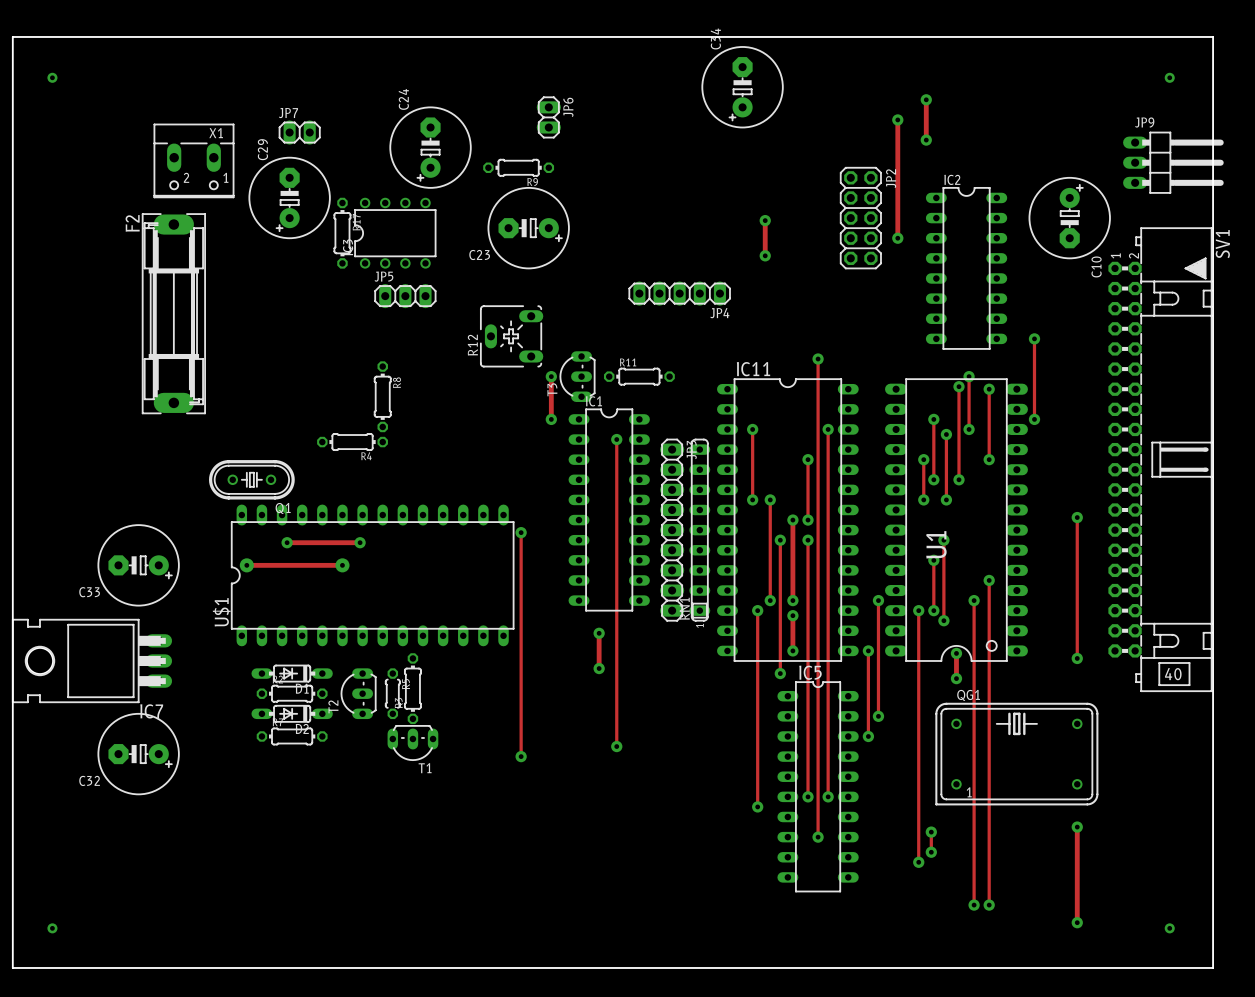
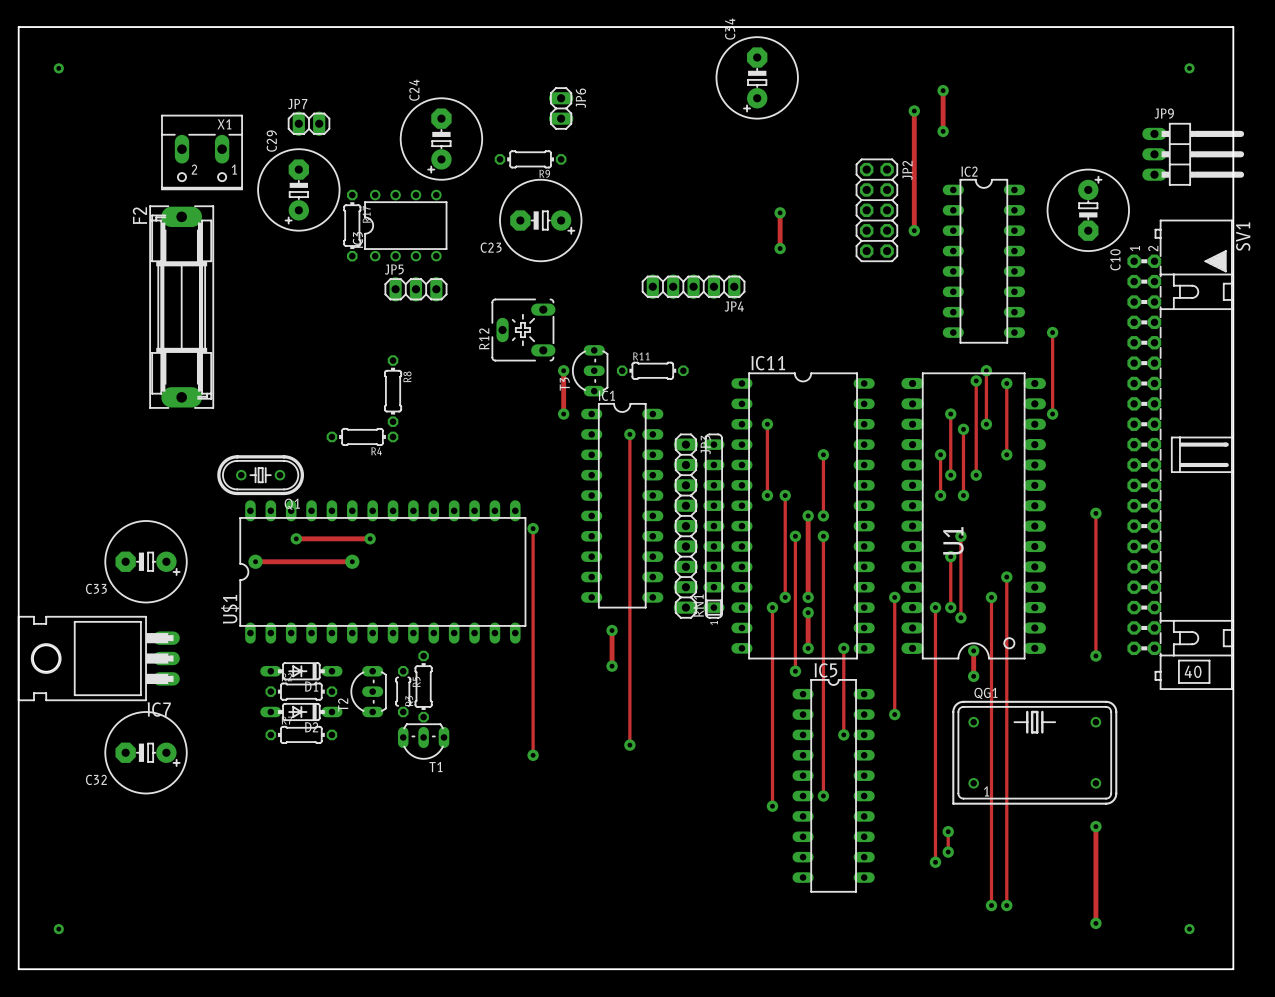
track: (818, 359) (818, 837) -> none
via: (818, 359) -> none
track: (828, 429) (828, 650) -> none
via: (828, 429) -> none
track: (868, 650) (868, 736) -> none
via position: (868, 650) -> (843, 648)
track: (828, 736) (828, 796) -> none
via: none -> (843, 734)
via: (868, 736) -> none
via: (828, 796) -> none
via: (818, 837) -> none

